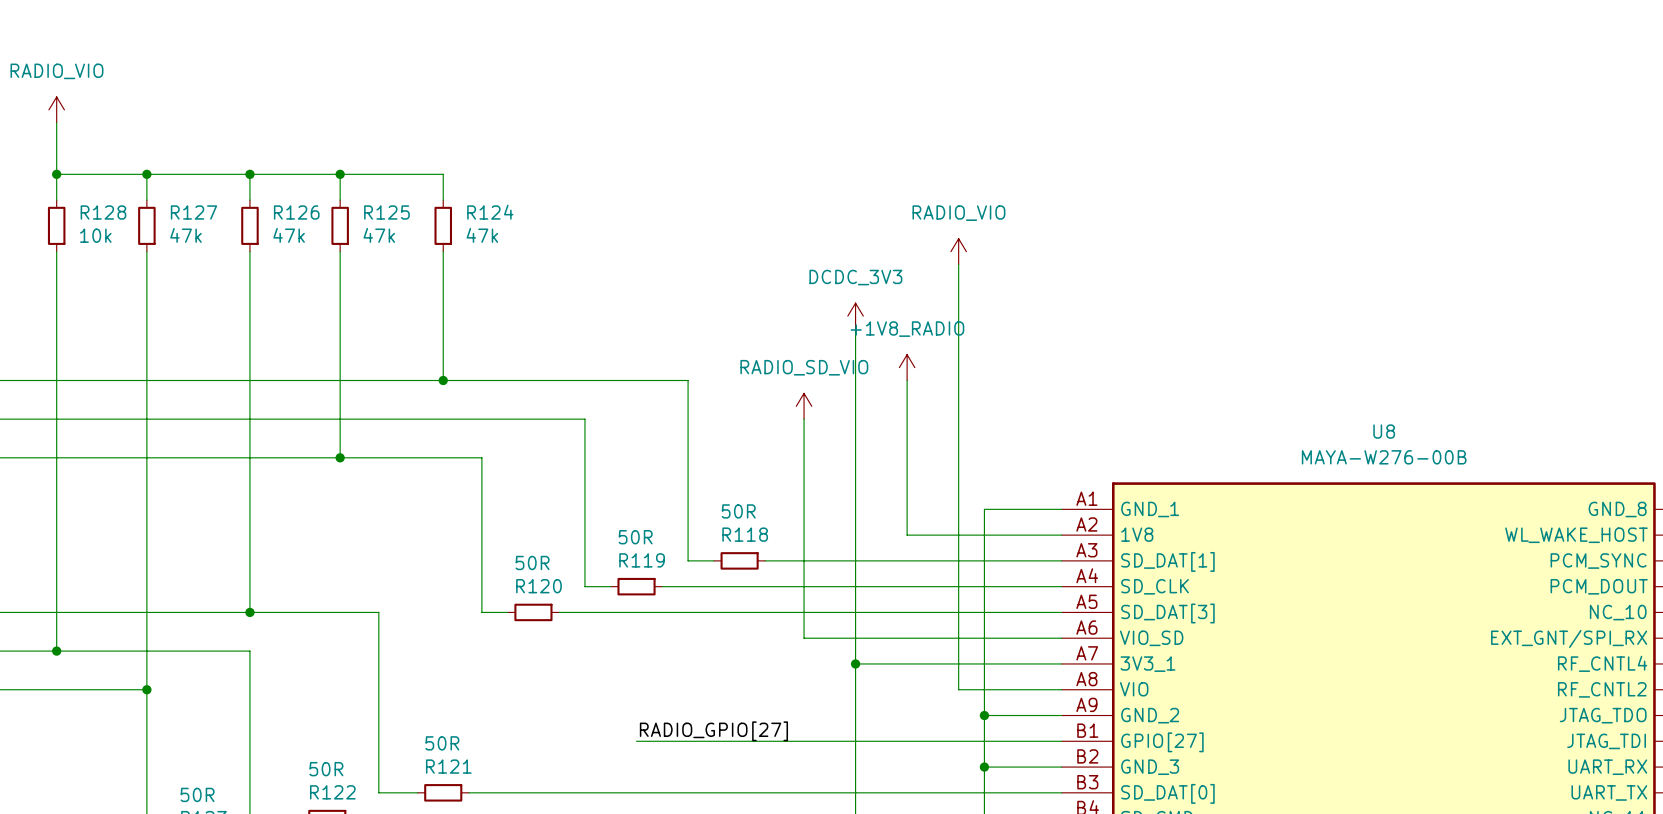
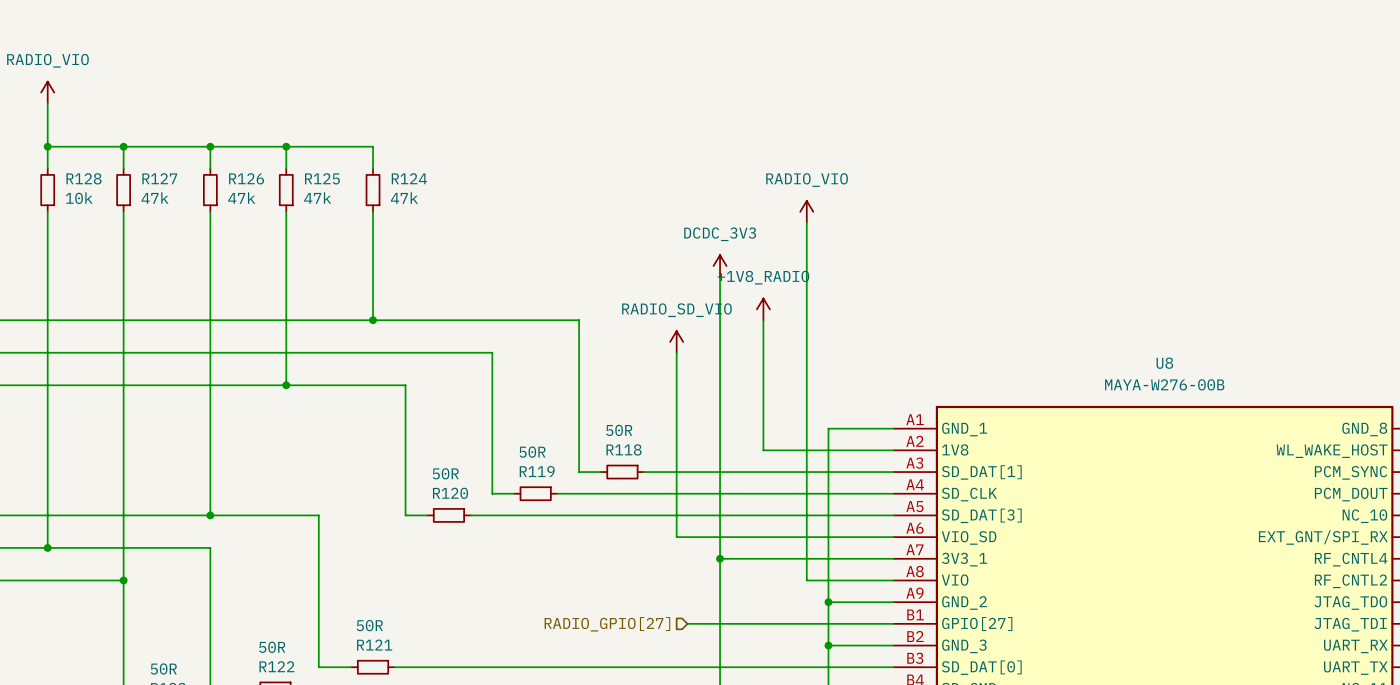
label: RADIO_GPIO[27] (713, 731) -> none
wire: (636, 741) (816, 741) -> none
hierarchical label: none -> RADIO_GPIO[27] (607, 624)

